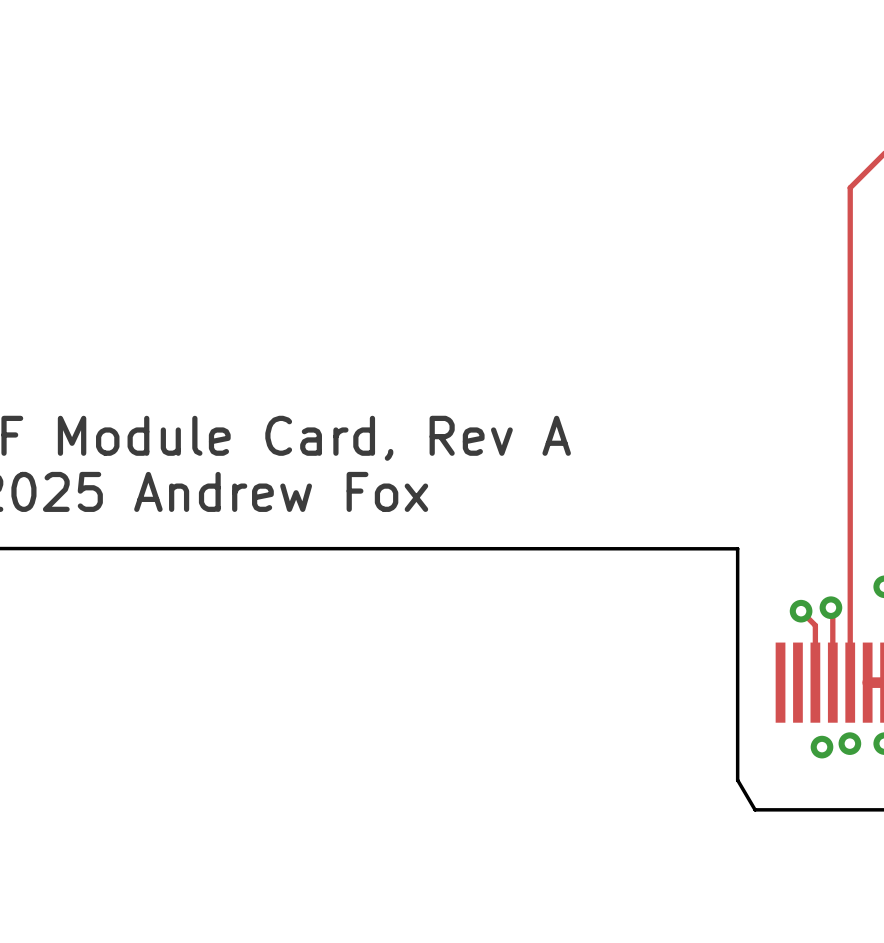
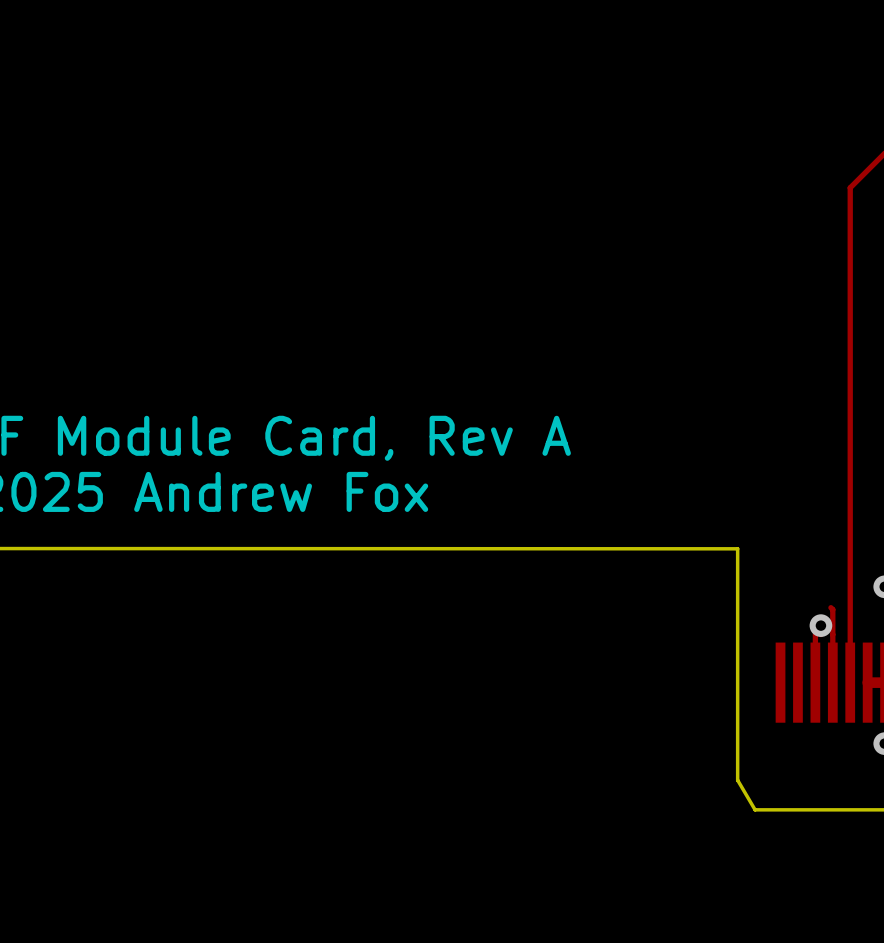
via: (830, 607) -> none
track: (801, 611) (815, 625) (815, 634) -> none
via: (801, 611) -> none
via: none -> (820, 625)
via: (849, 743) -> none
via: (822, 747) -> none

